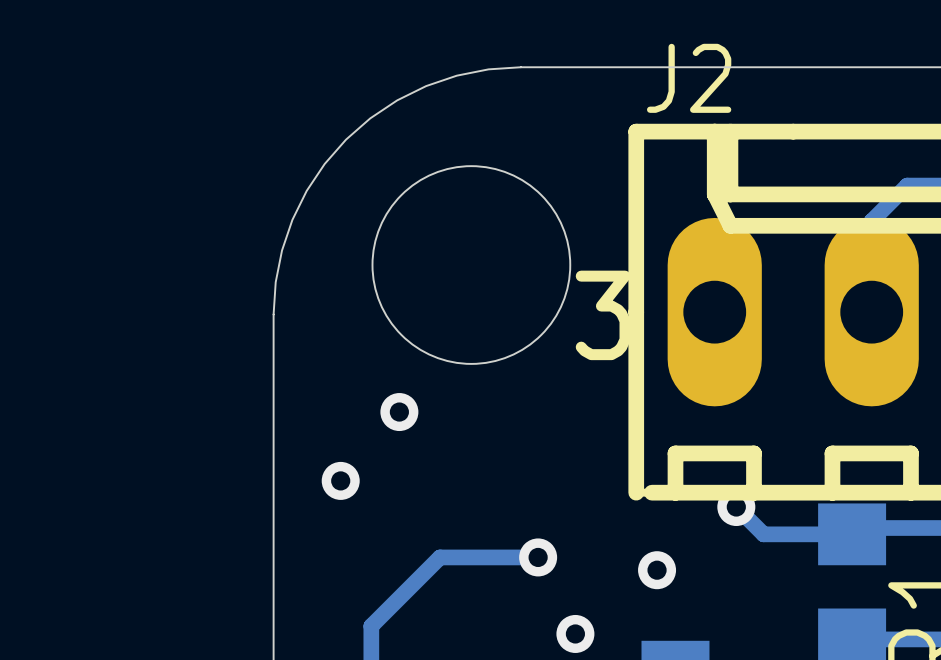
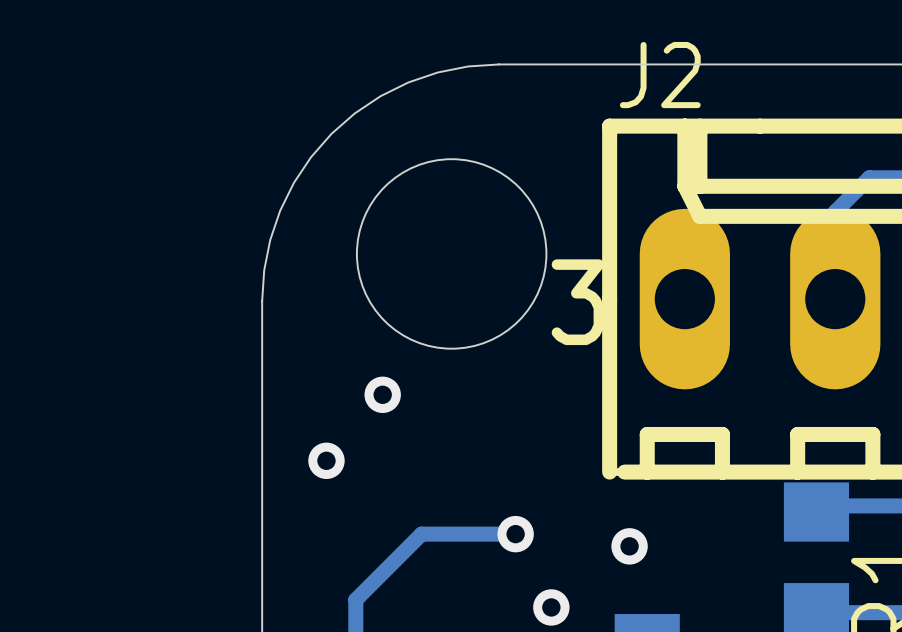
track: (736, 507) (763, 534) (852, 534) -> none
via: (736, 507) -> none

